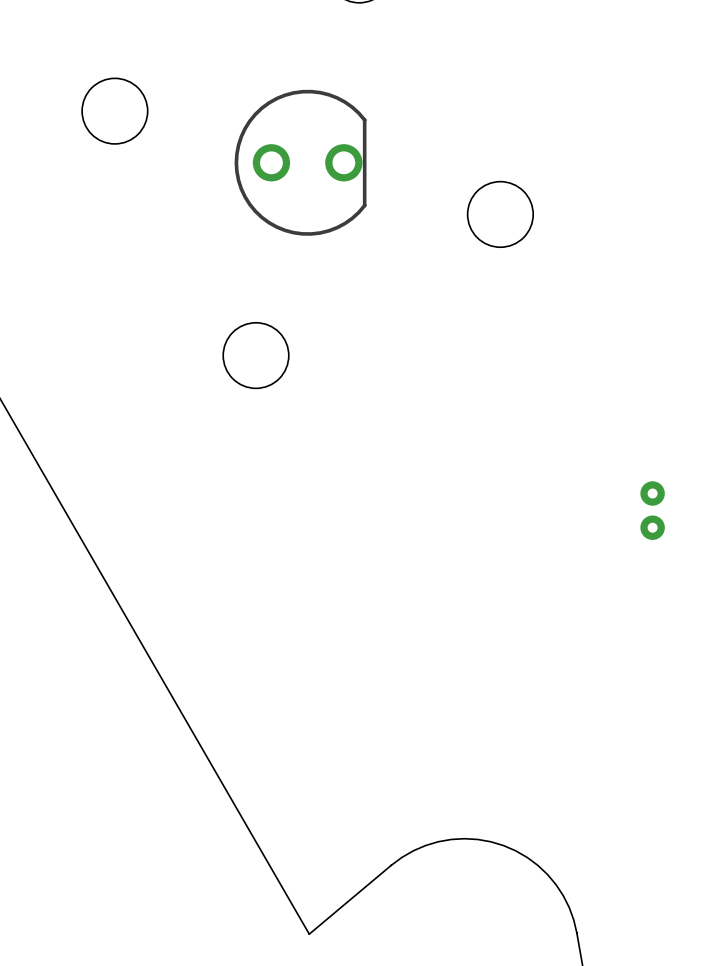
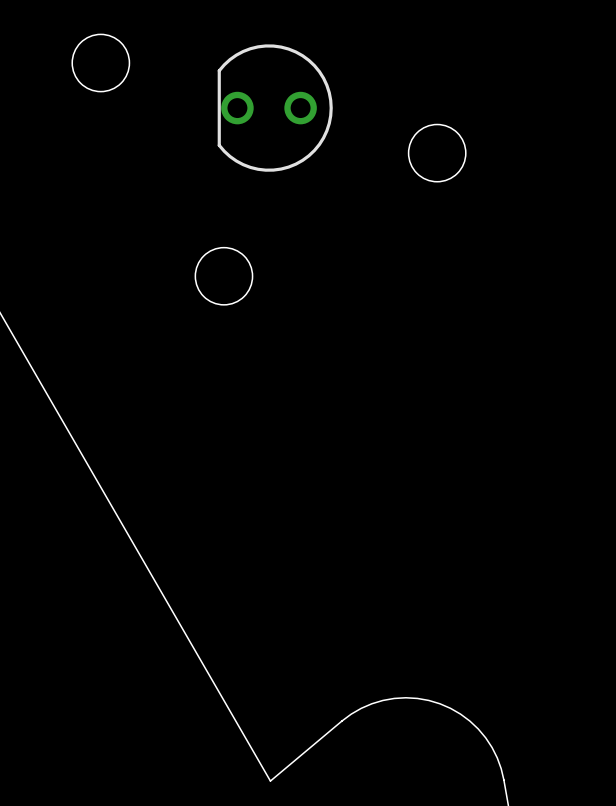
part rotation: 0° (300, 162) -> 180° (275, 108)
part: (652, 510) -> none

